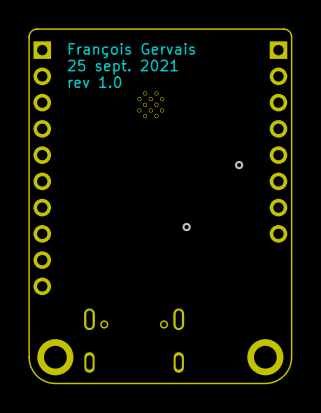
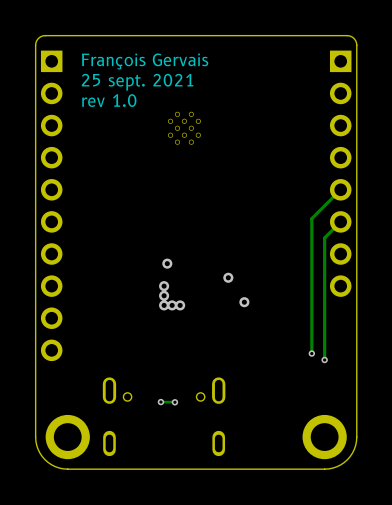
track: none -> (340, 189) (311, 218) (311, 353)
via: (239, 165) -> none
track: none -> (340, 221) (324, 237) (324, 359)
via: none -> (167, 263)
via: none -> (164, 286)
via: none -> (164, 295)
via: none -> (244, 302)
via: none -> (164, 305)
via: none -> (172, 305)
via: none -> (180, 305)
via: none -> (311, 353)
via: none -> (324, 359)
track: none -> (160, 402) (174, 402)
via: none -> (160, 402)
via: none -> (174, 402)

